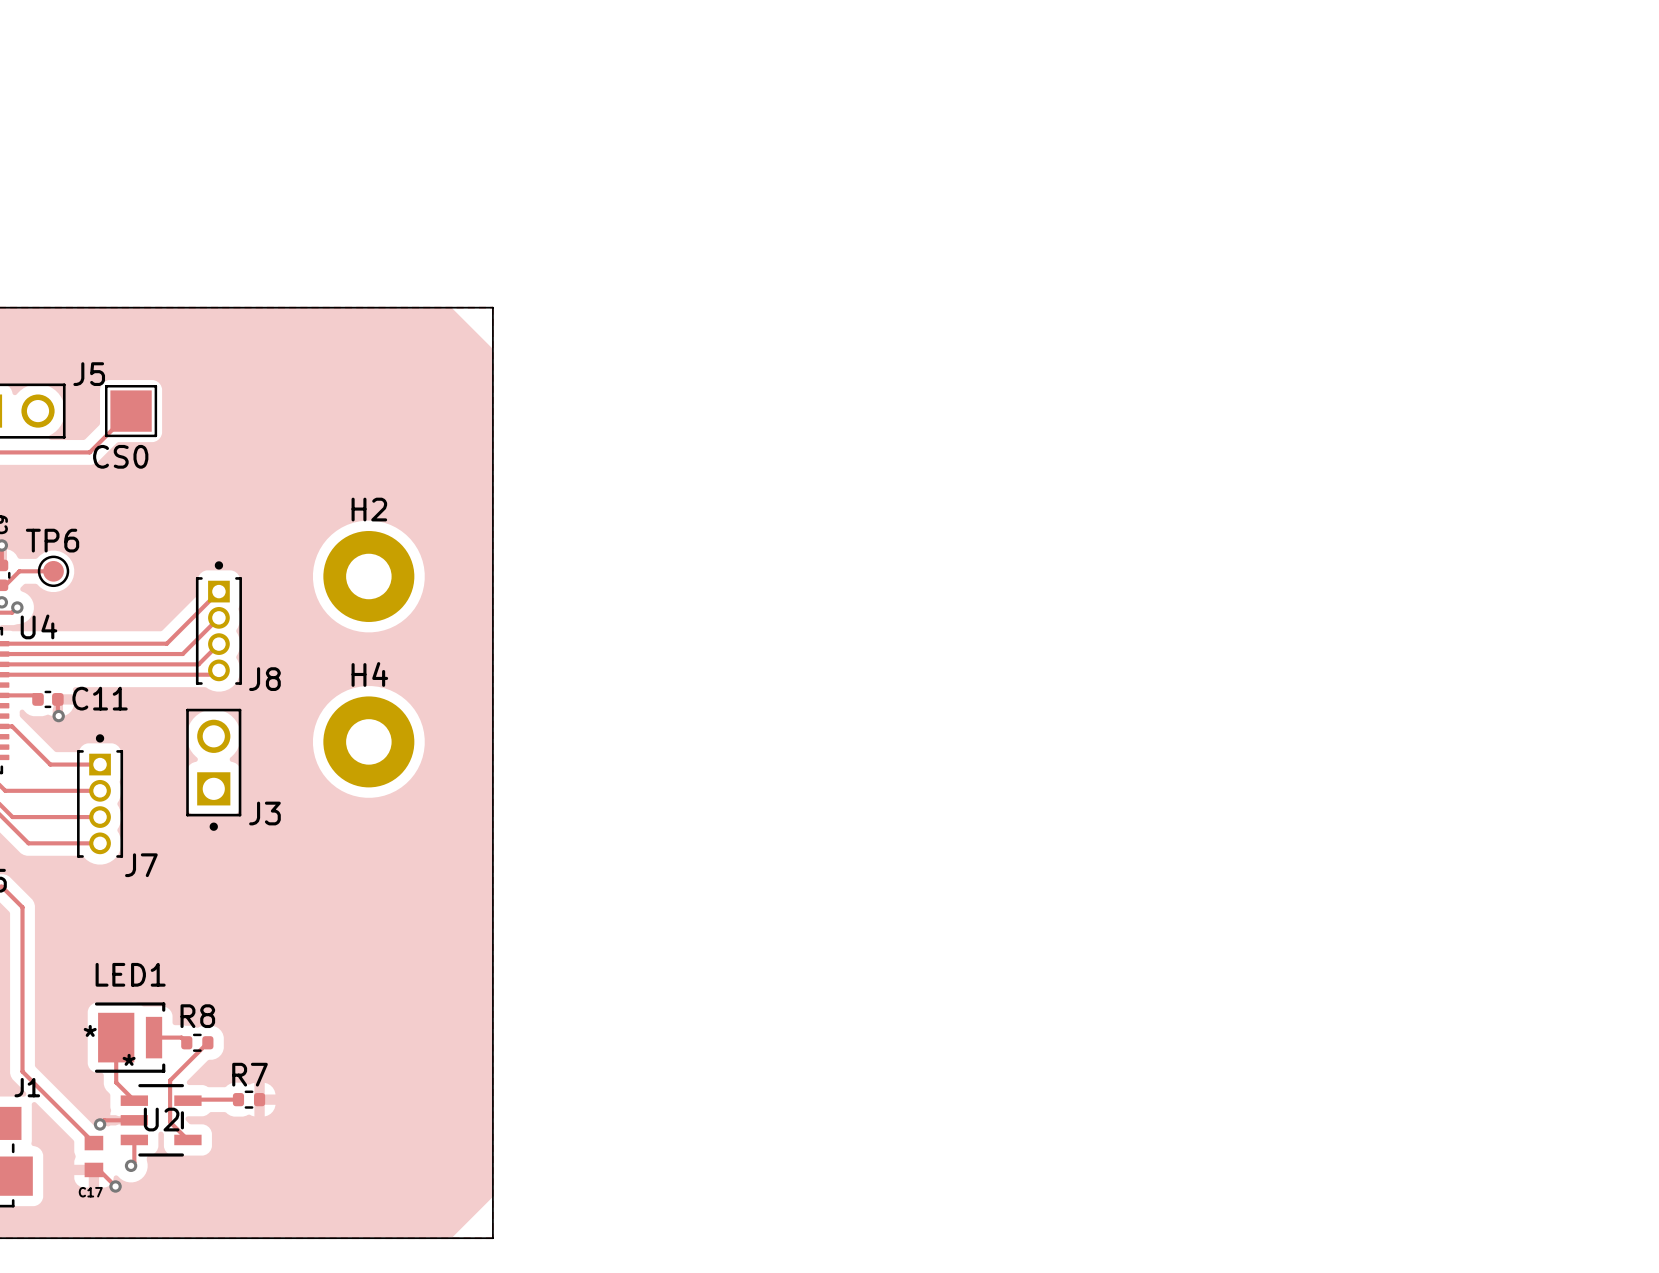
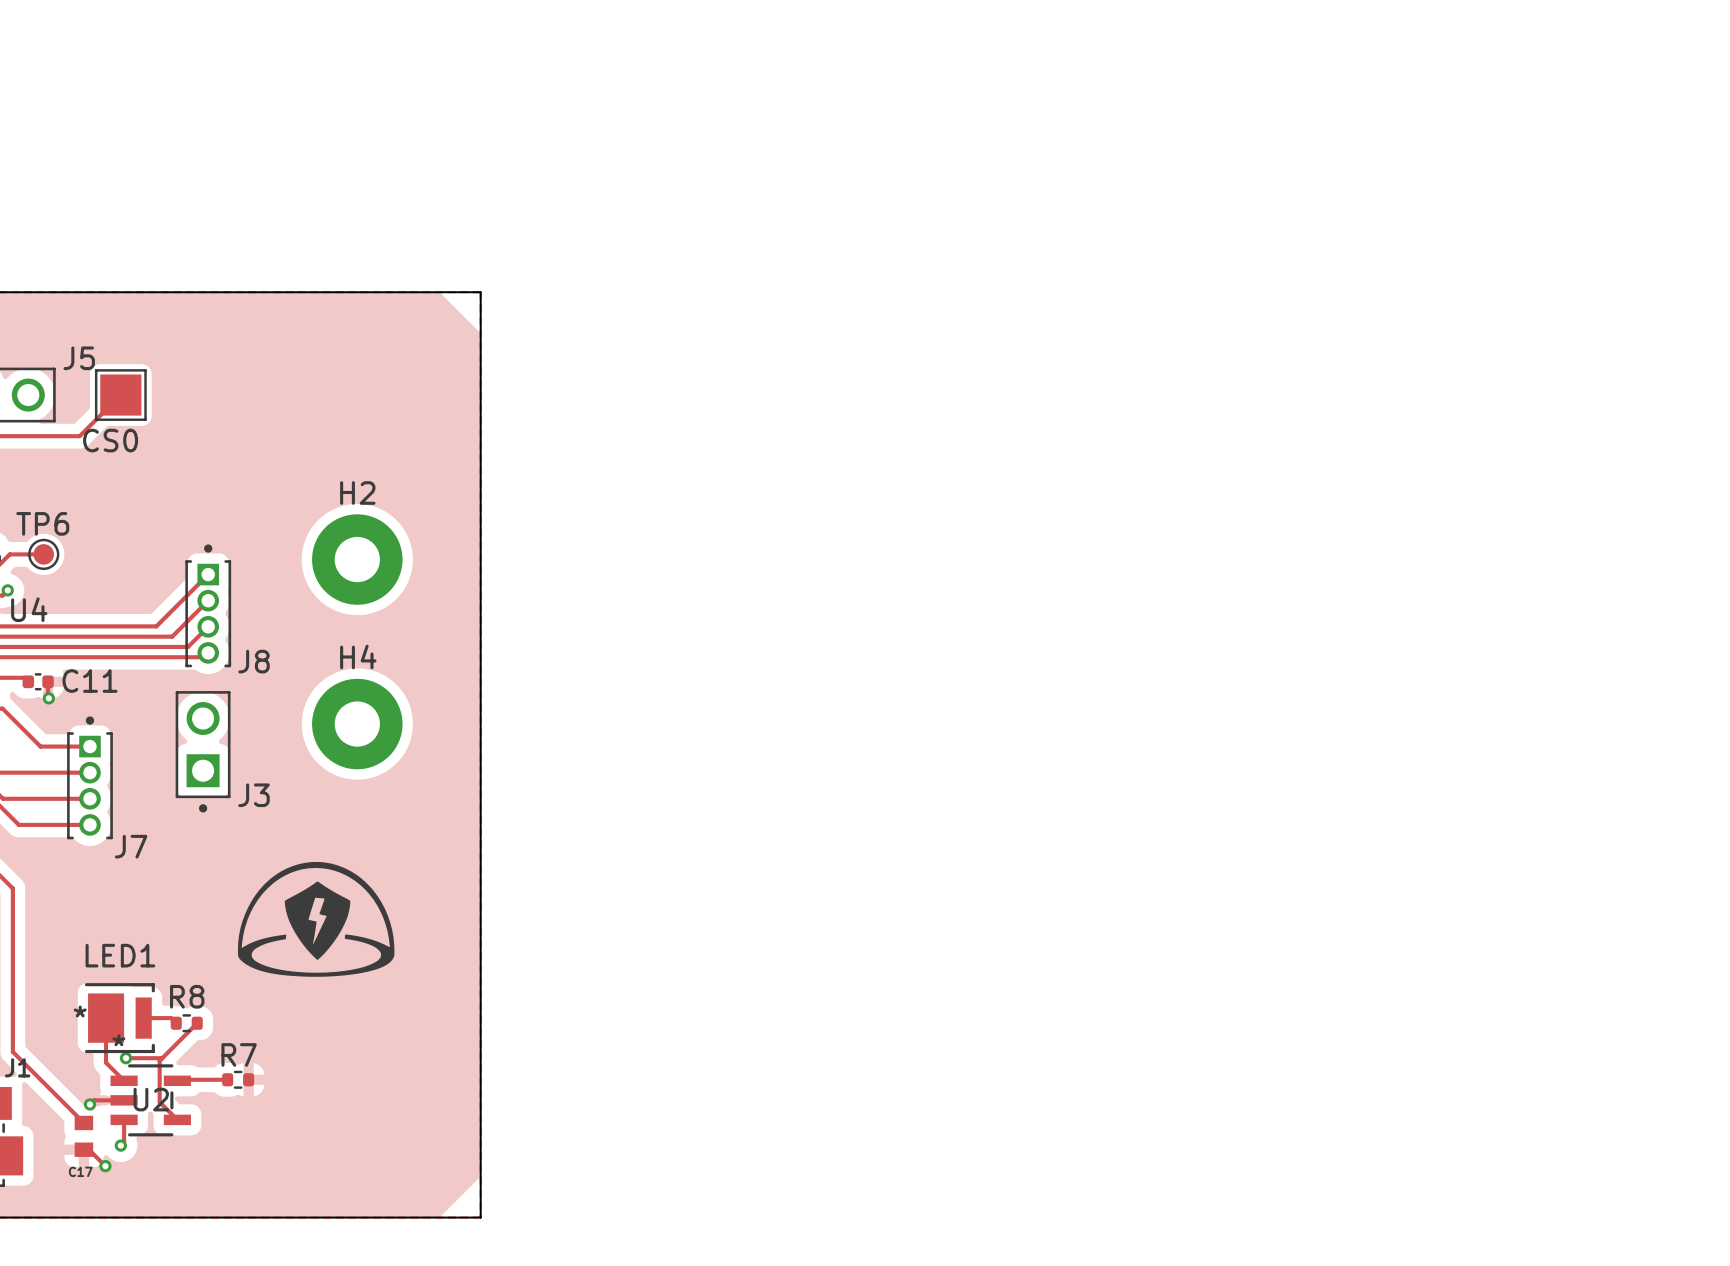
drawing: none -> [237, 861, 395, 977]
track: none -> (125, 1058) (161, 1058)
via: none -> (125, 1058)

